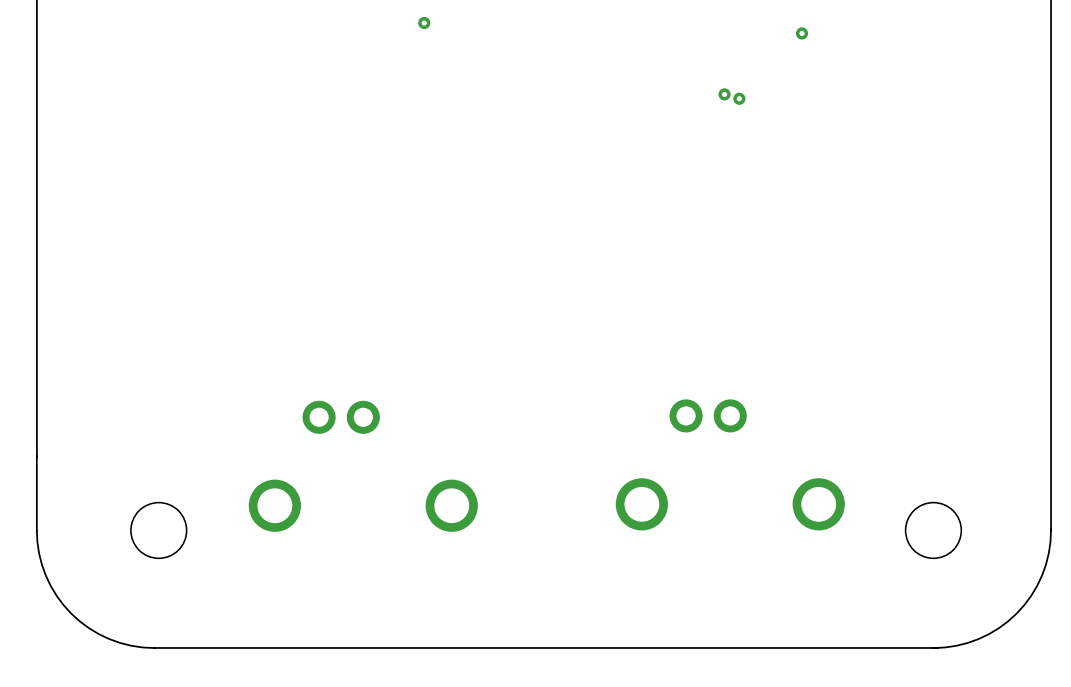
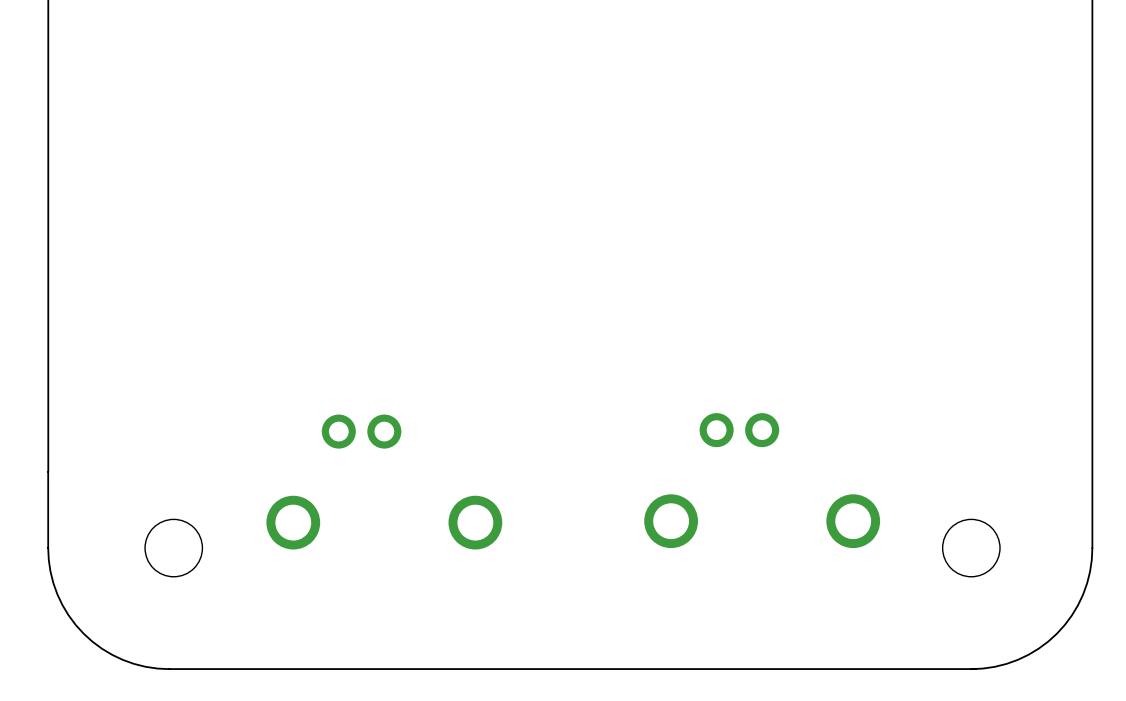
via: (424, 23) -> none
via: (802, 33) -> none
via: (724, 94) -> none
via: (739, 98) -> none

